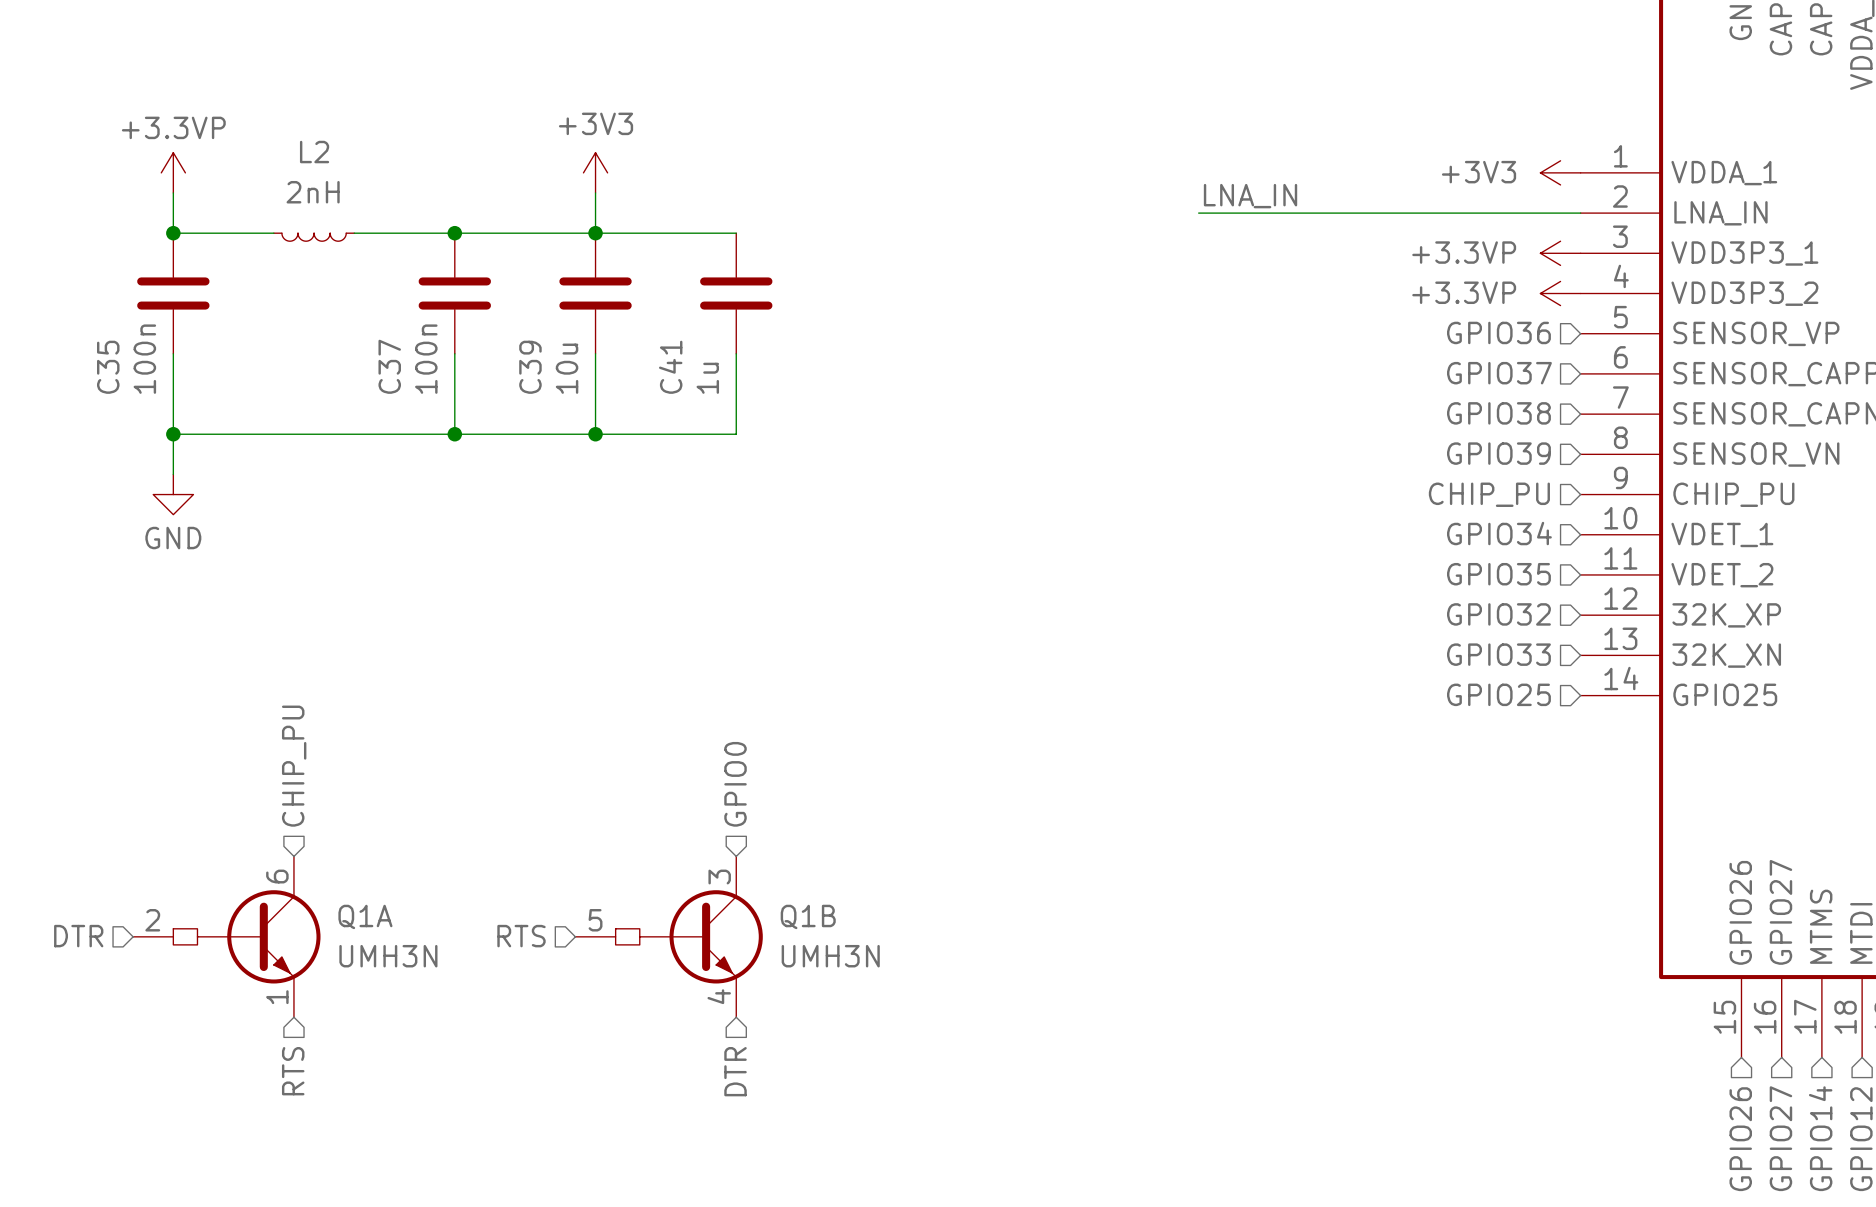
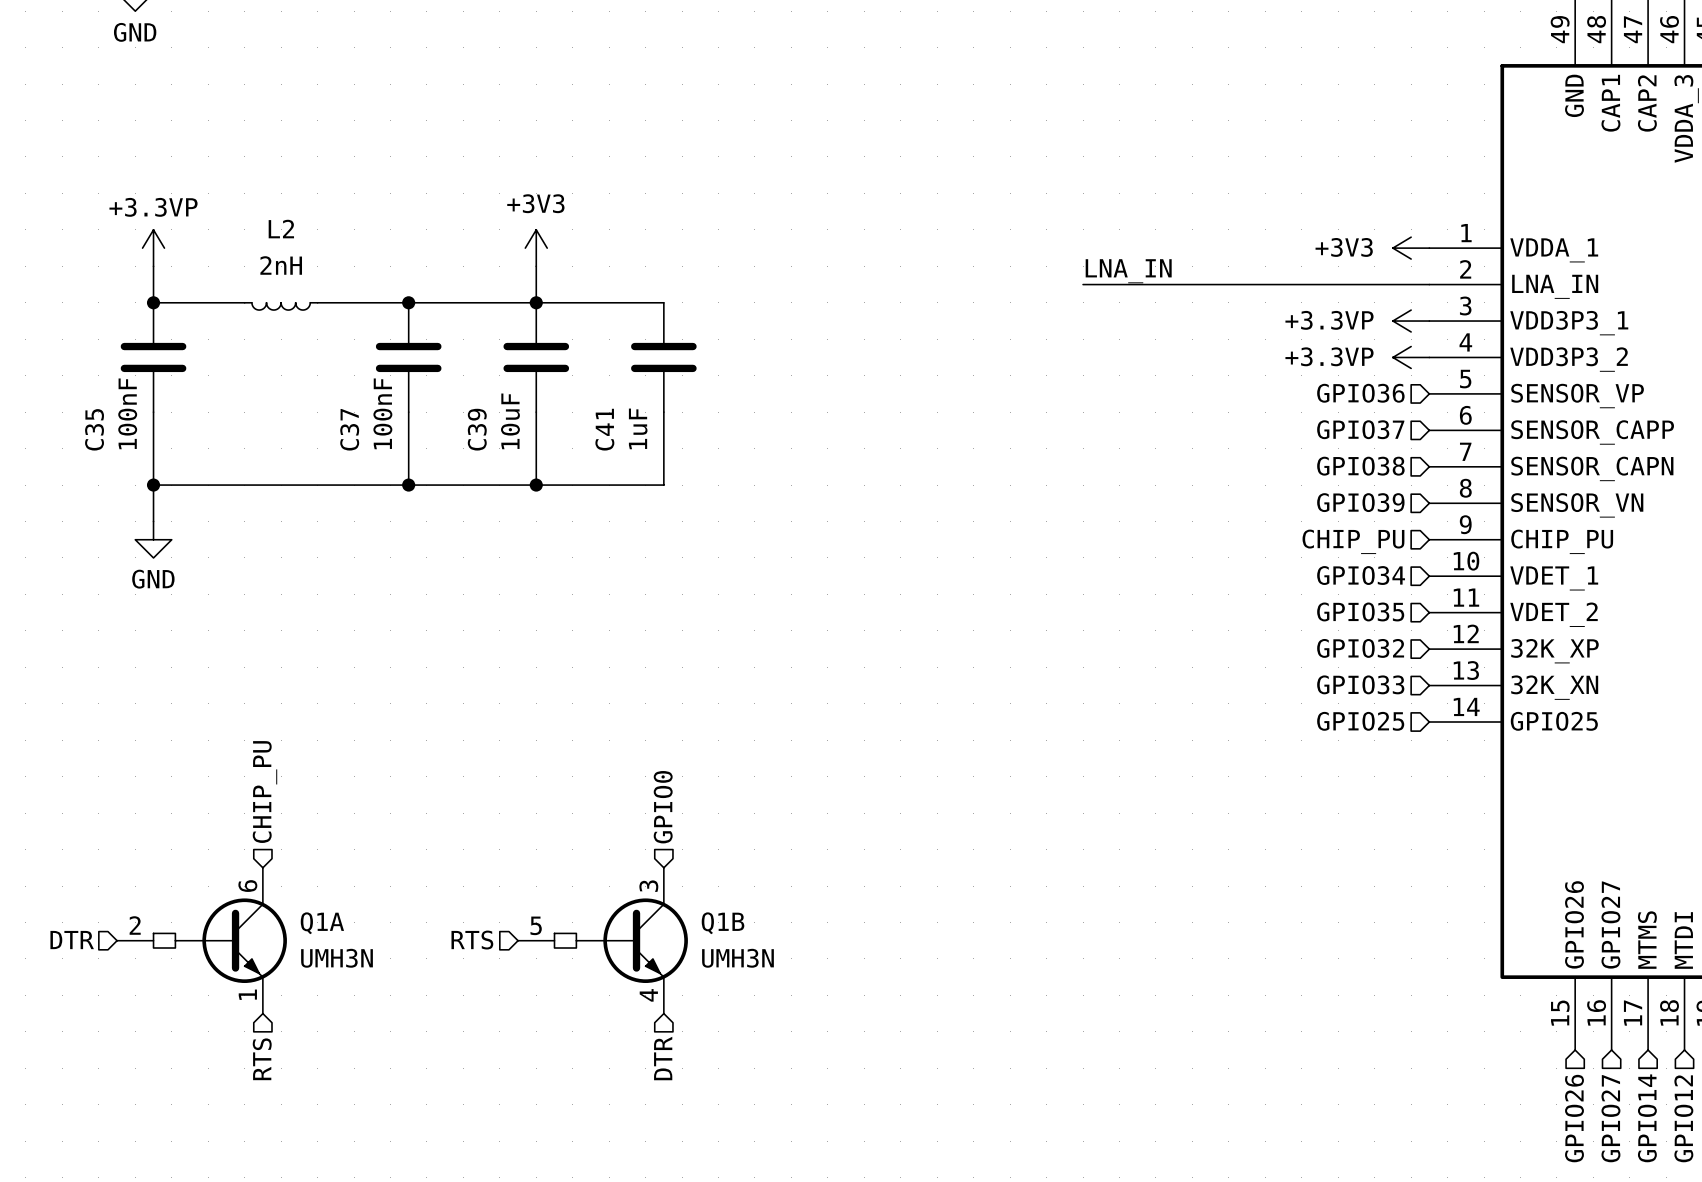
C35 value: 100n (144, 359) -> 100nF (127, 413)
C37 value: 100n (426, 359) -> 100nF (382, 413)
C39 value: 10u (567, 368) -> 10uF (510, 421)
C41 value: 1u (707, 378) -> 1uF (638, 428)

